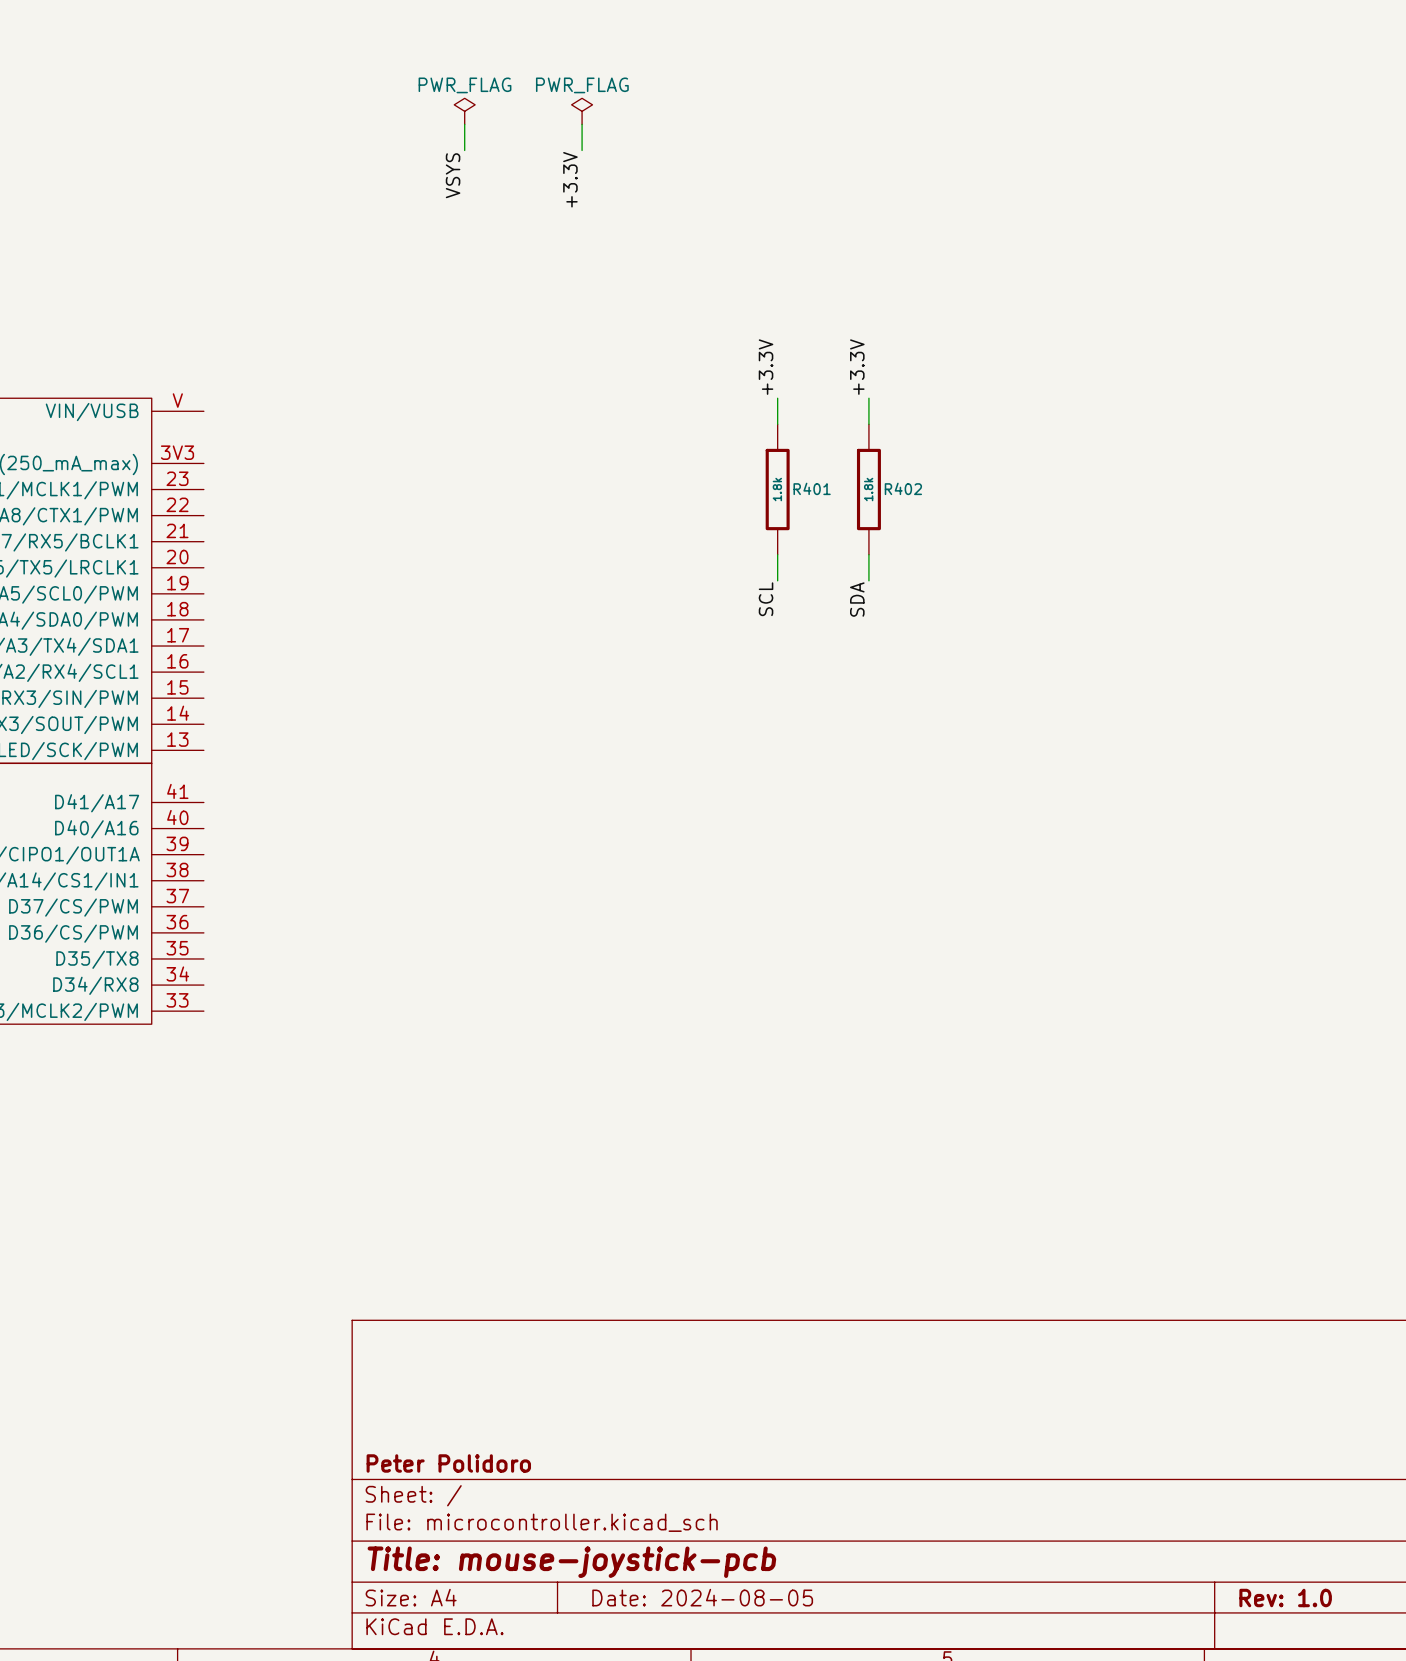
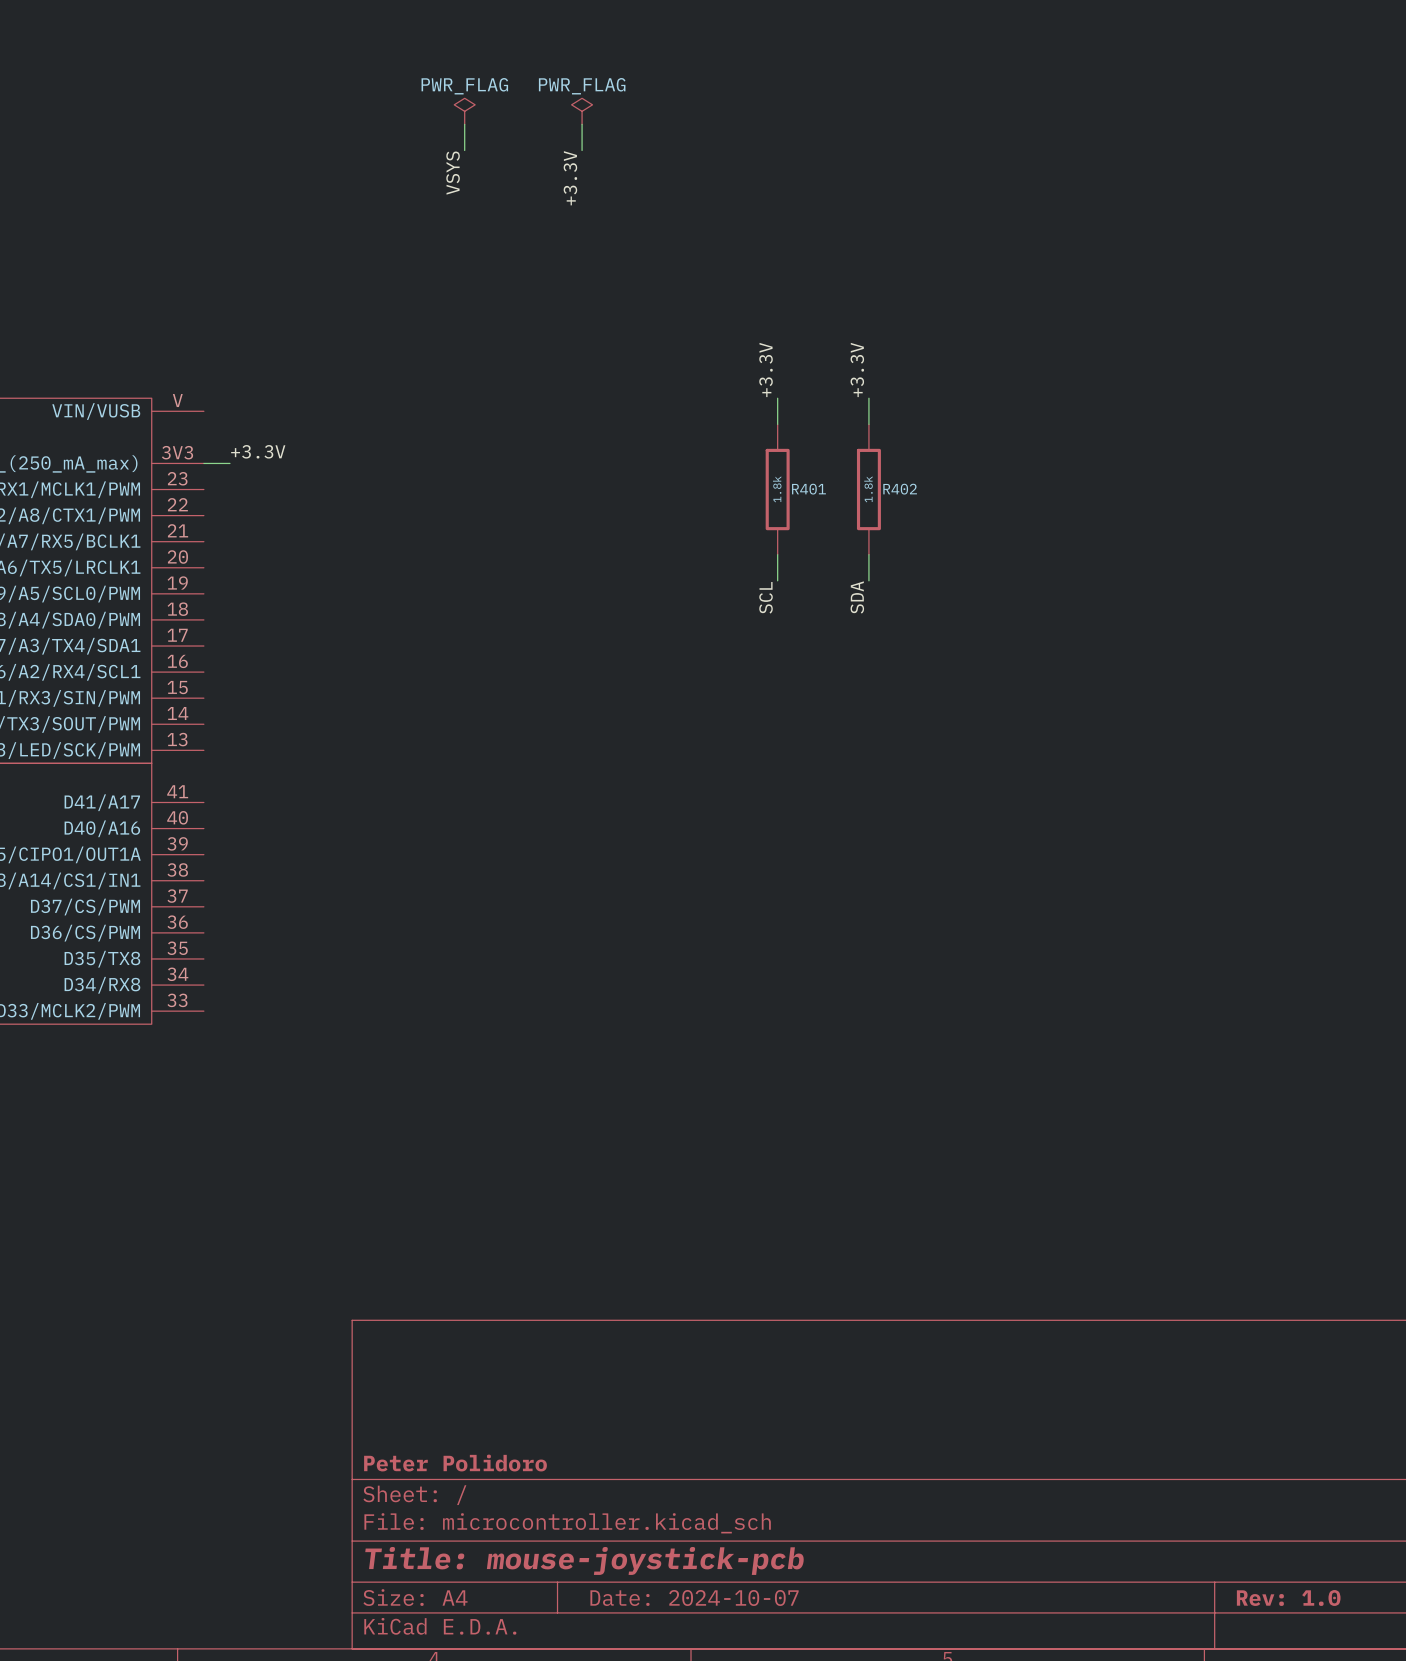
label: none -> +3.3V (258, 451)
wire: none -> (203, 463) (229, 463)
title block: Date: 2024-08-05 (702, 1597) -> Date: 2024-10-07 (694, 1598)

